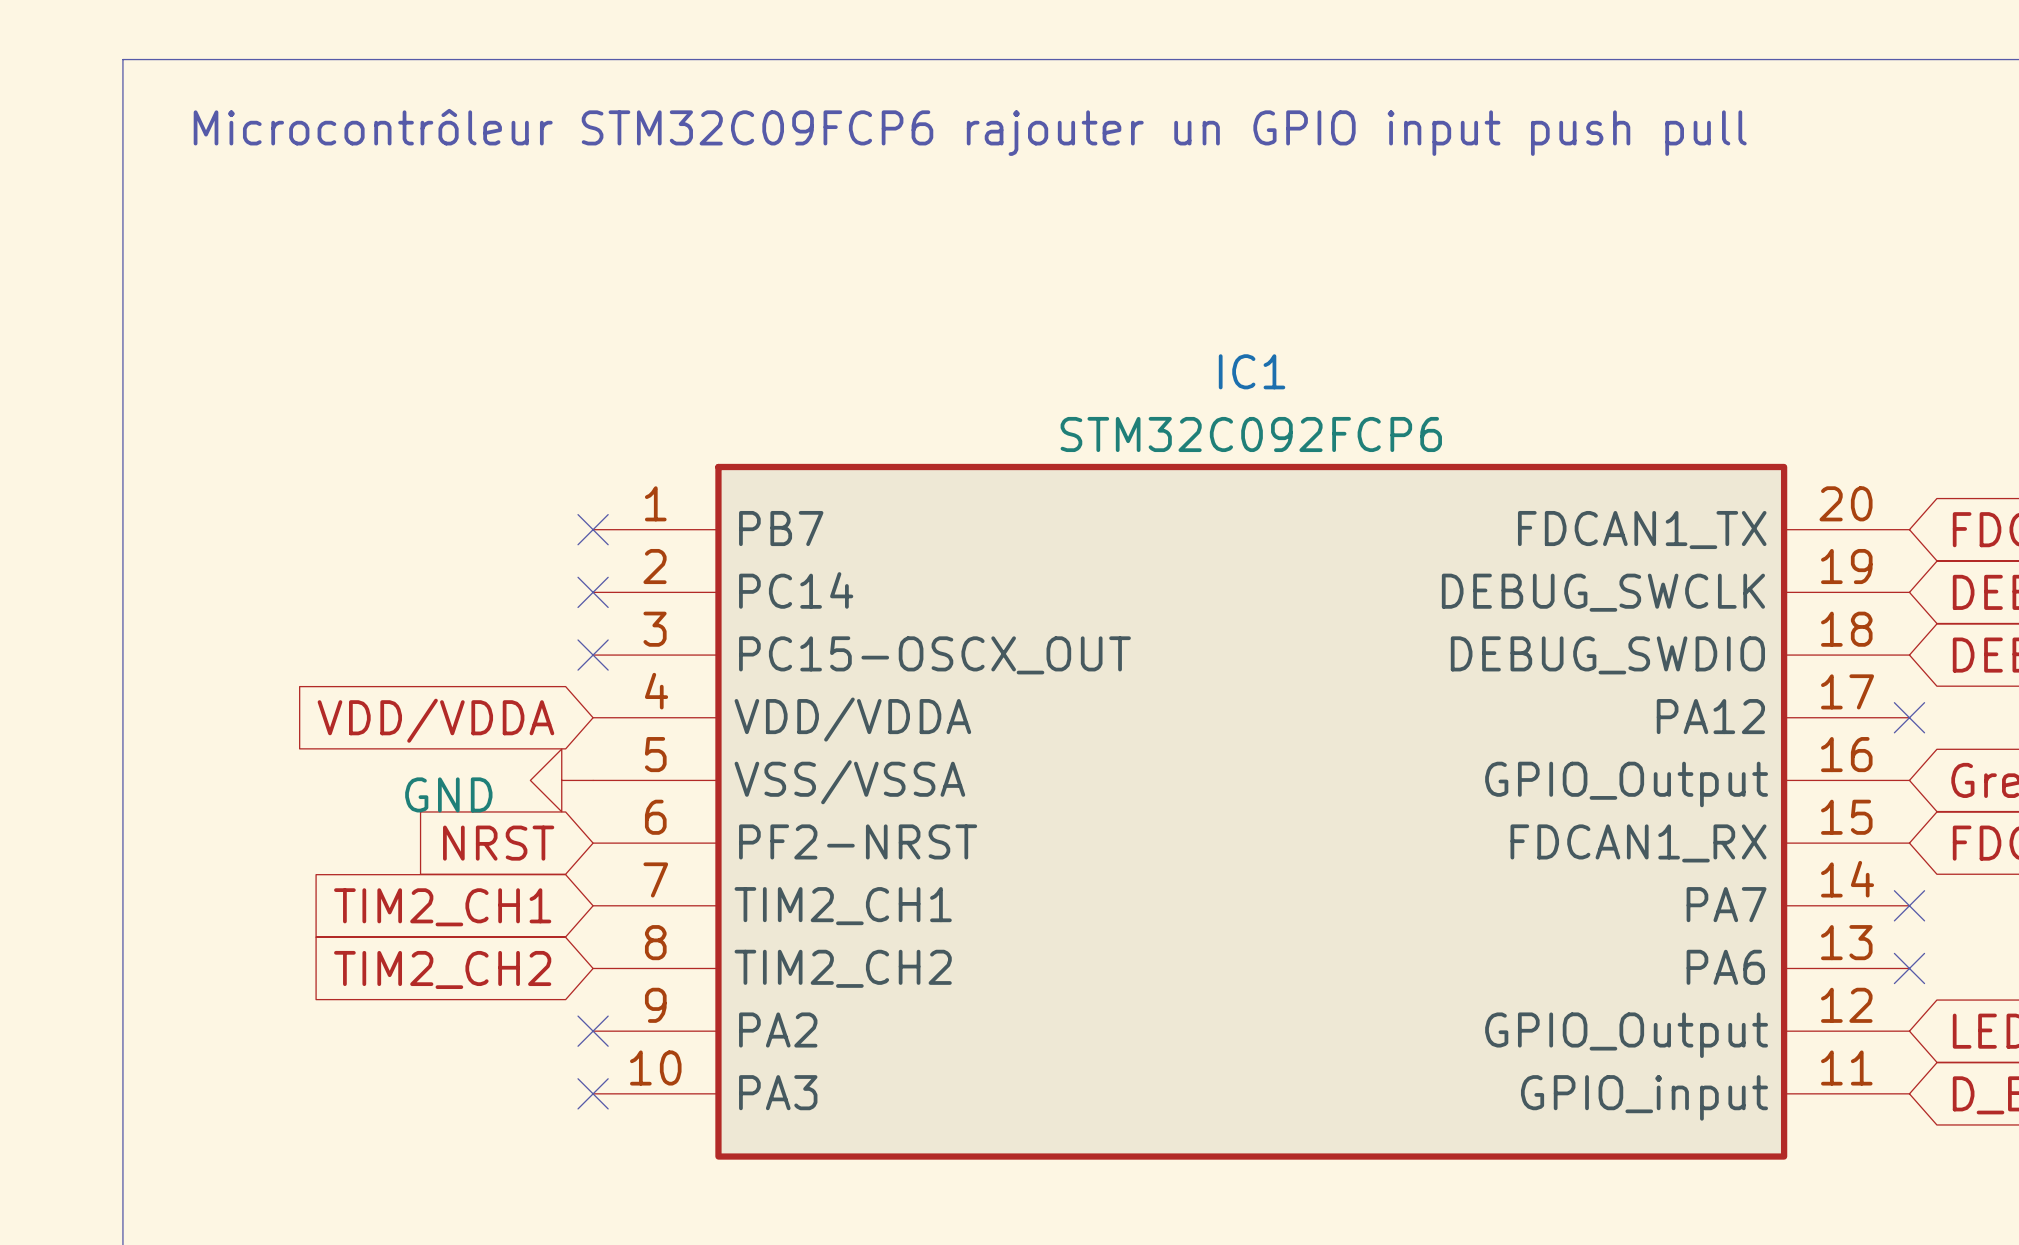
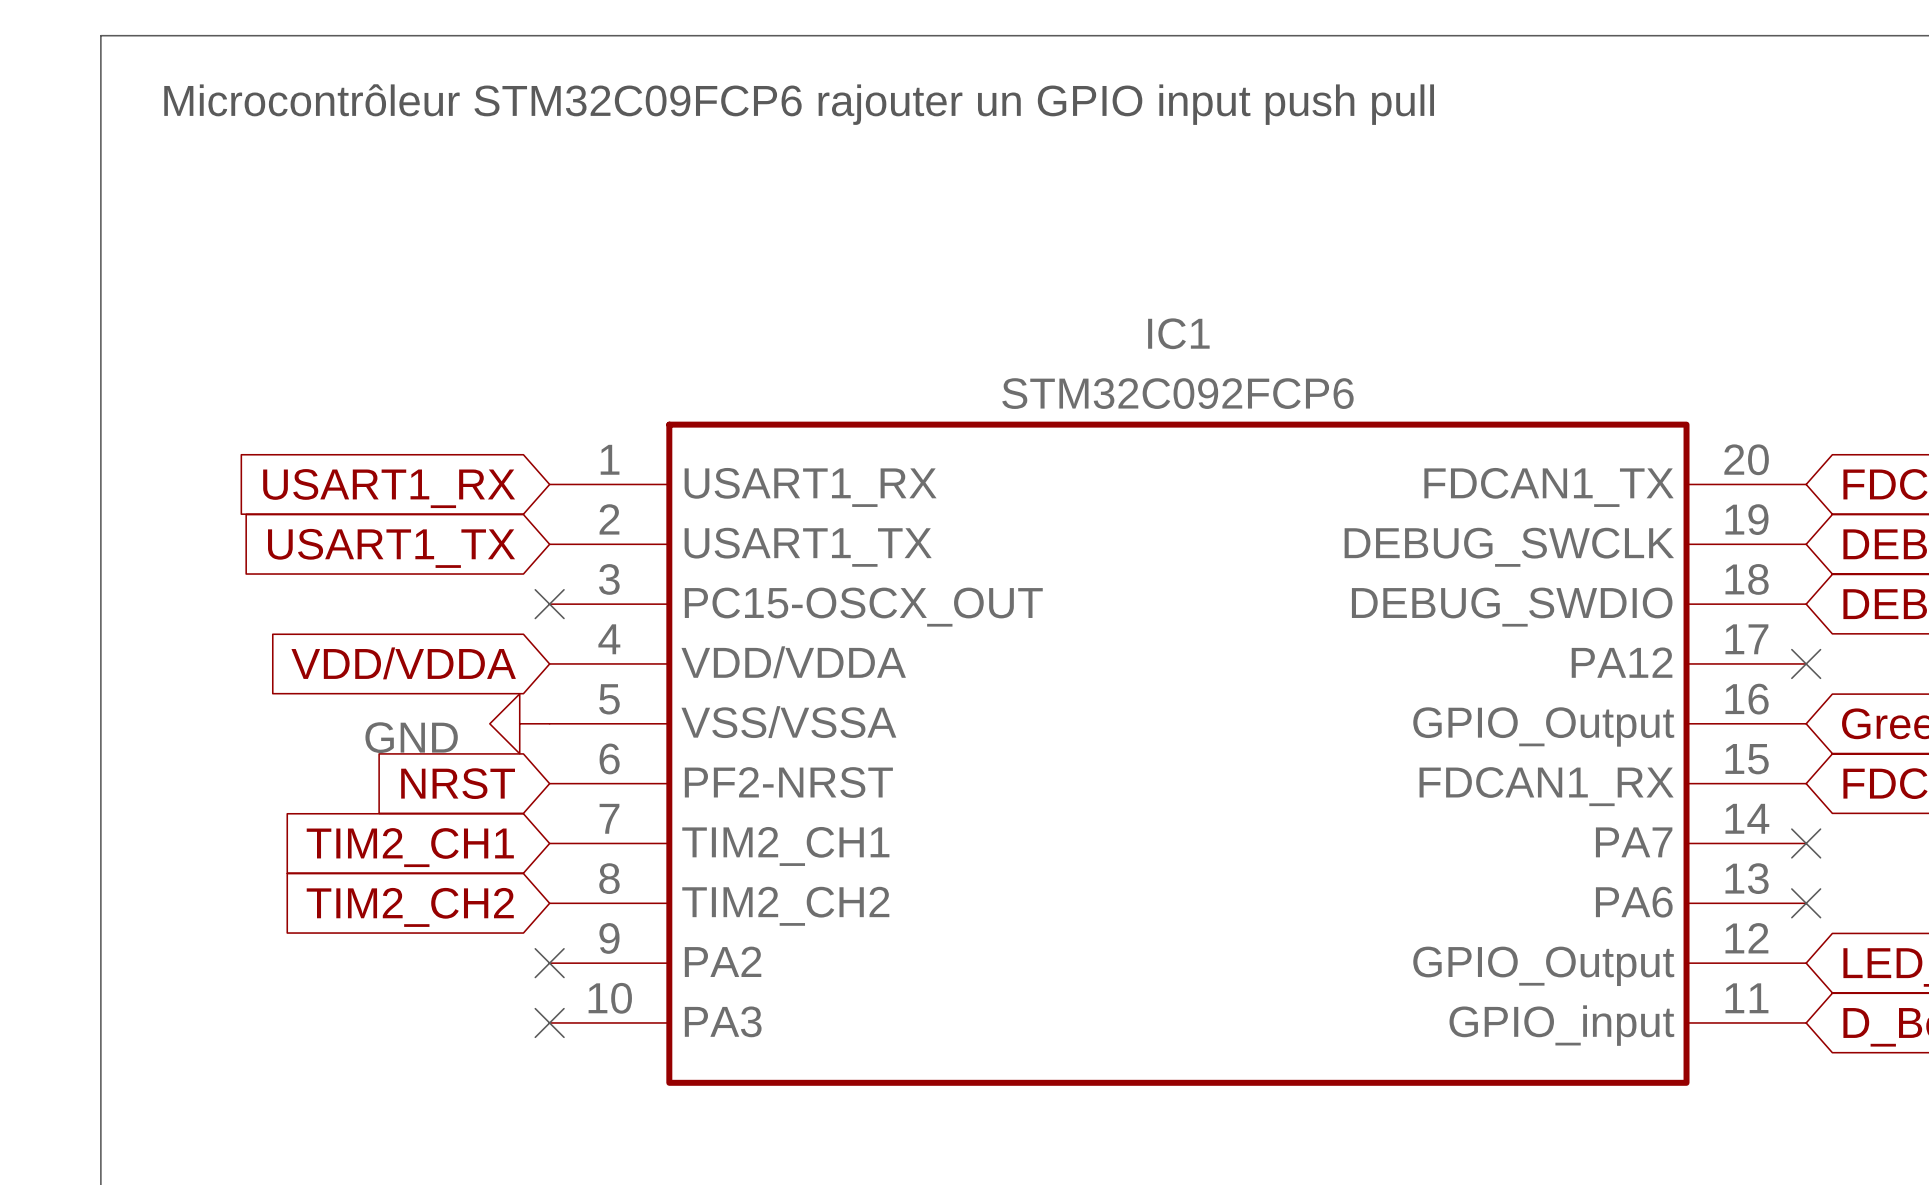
IC1 pin name: PB7 (781, 528) -> USART1_RX (810, 487)
no-connect mark: (593, 529) -> none
global label: none -> USART1_RX (389, 488)
IC1 pin name: PC14 (796, 590) -> USART1_TX (808, 547)
no-connect mark: (593, 592) -> none
global label: none -> USART1_TX (391, 548)

